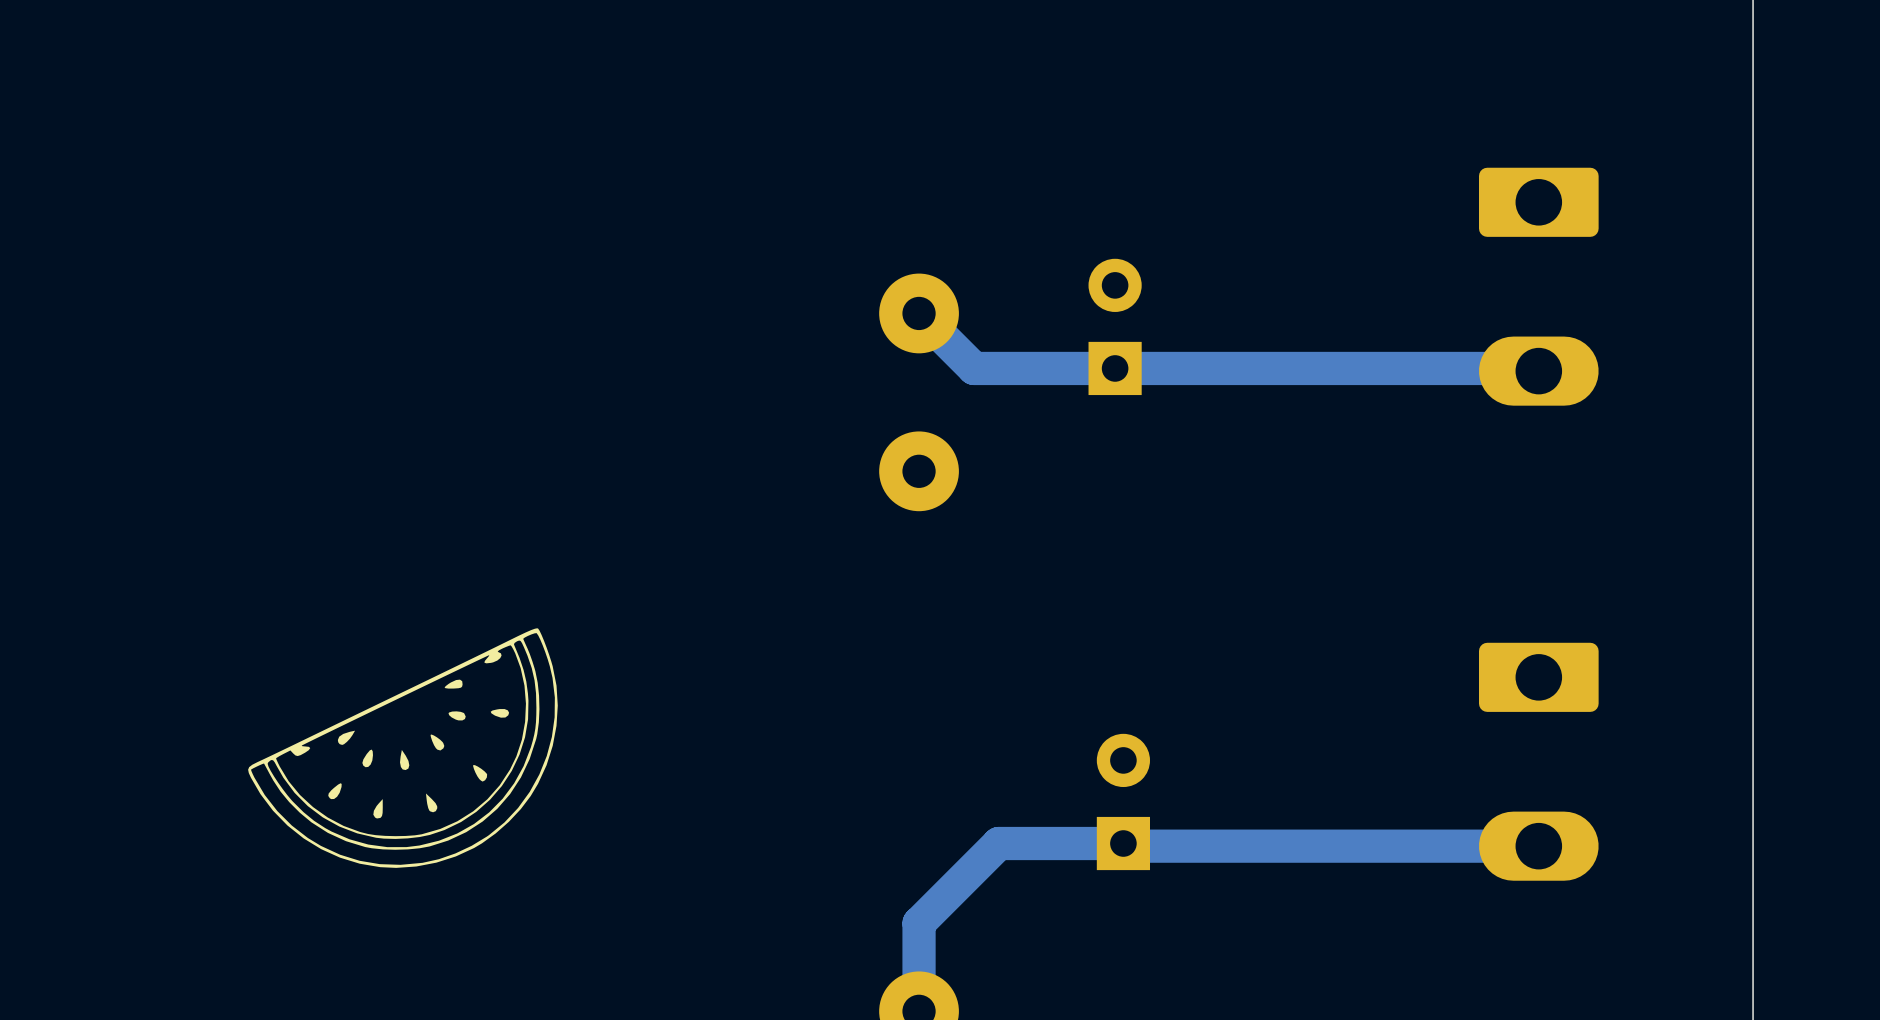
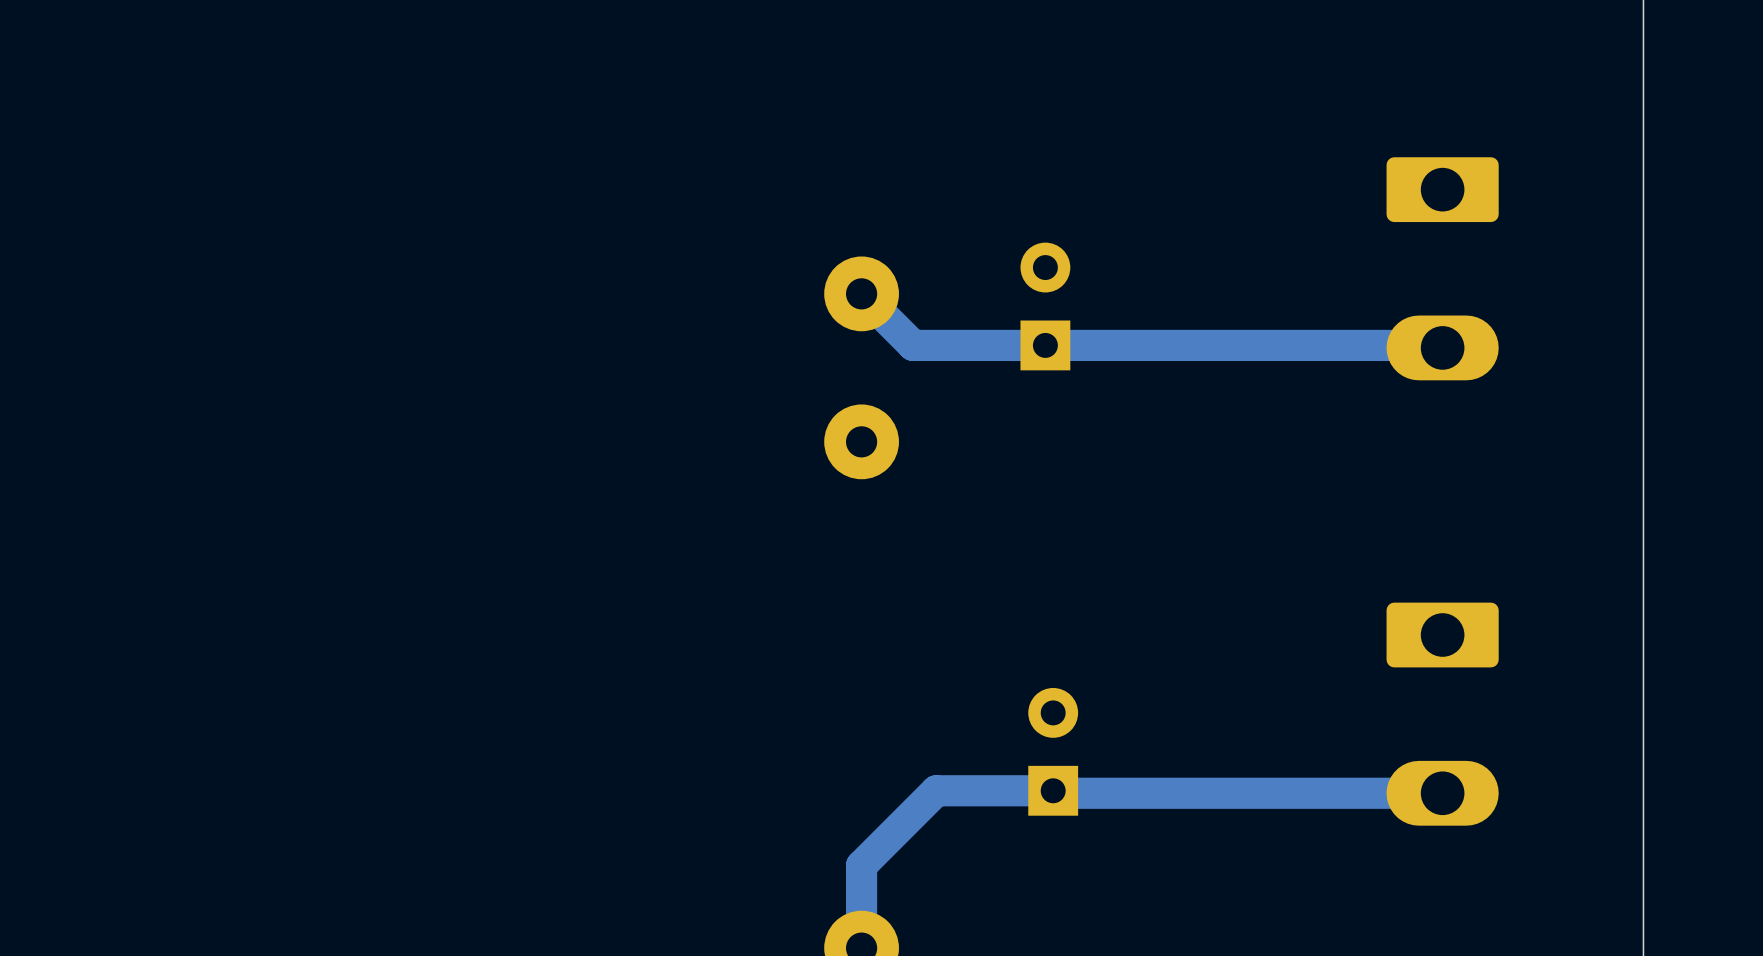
drawing: [248, 628, 558, 868] -> none

